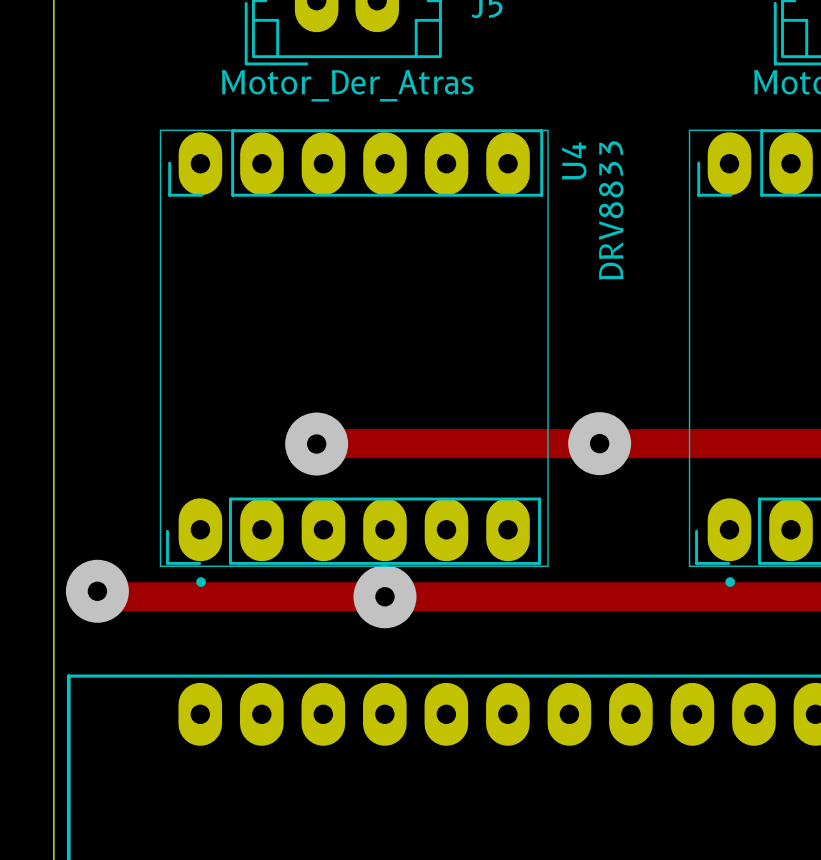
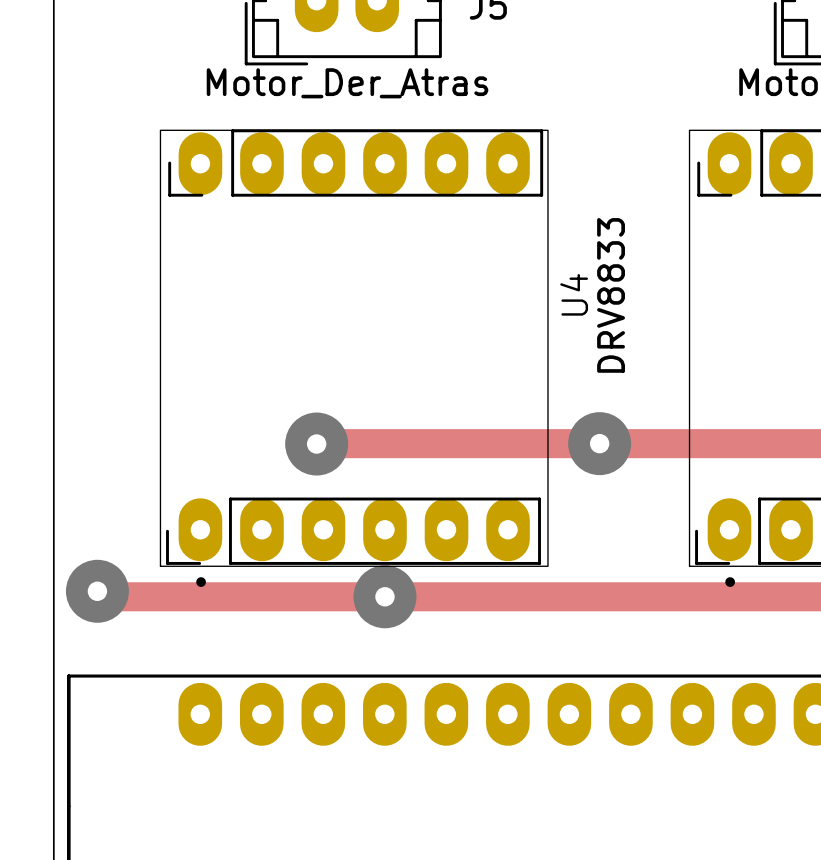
U4 name position: U4 (574, 161) -> U4 (574, 294)
U4 value position: DRV8833 (611, 210) -> DRV8833 (611, 295)

